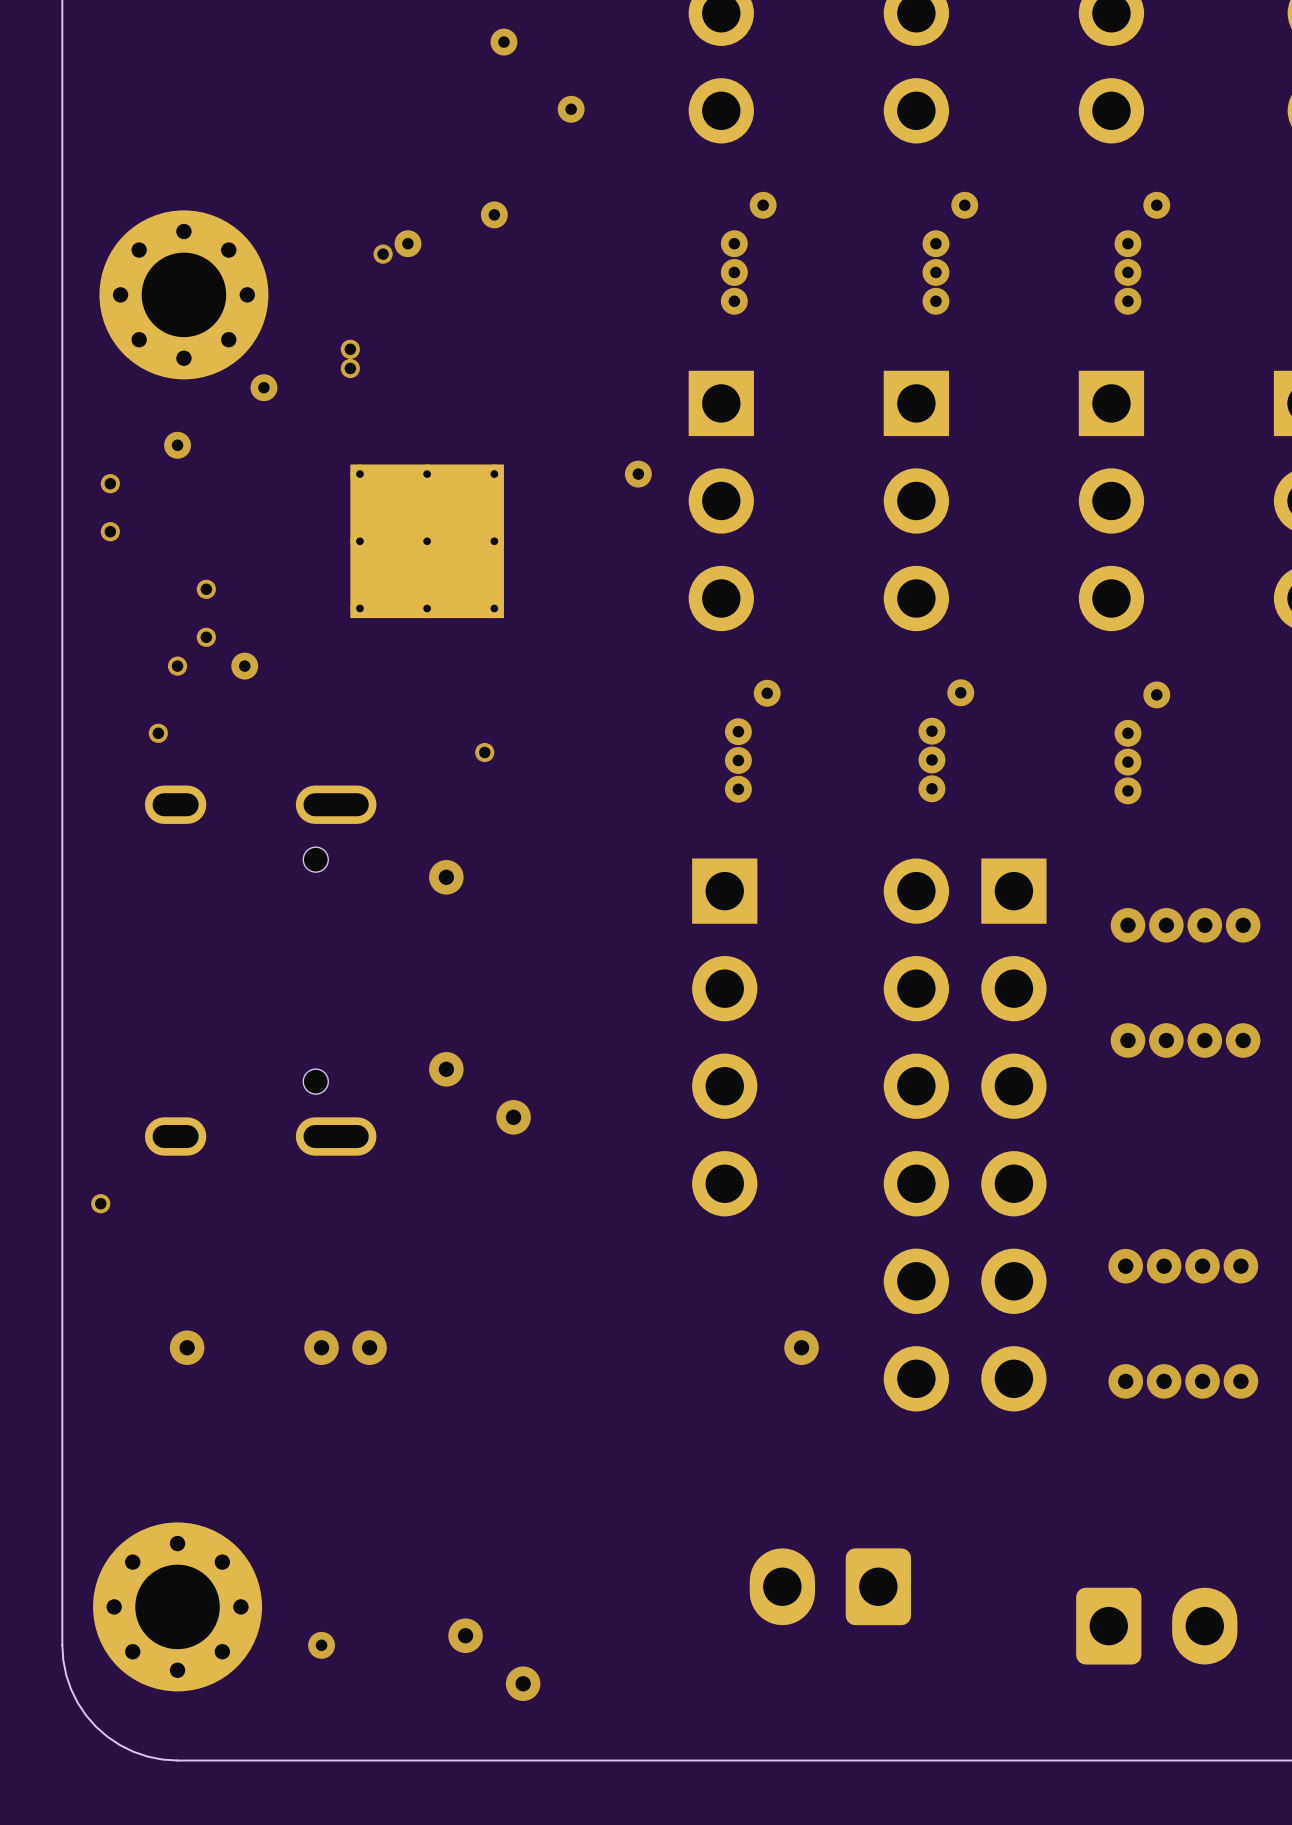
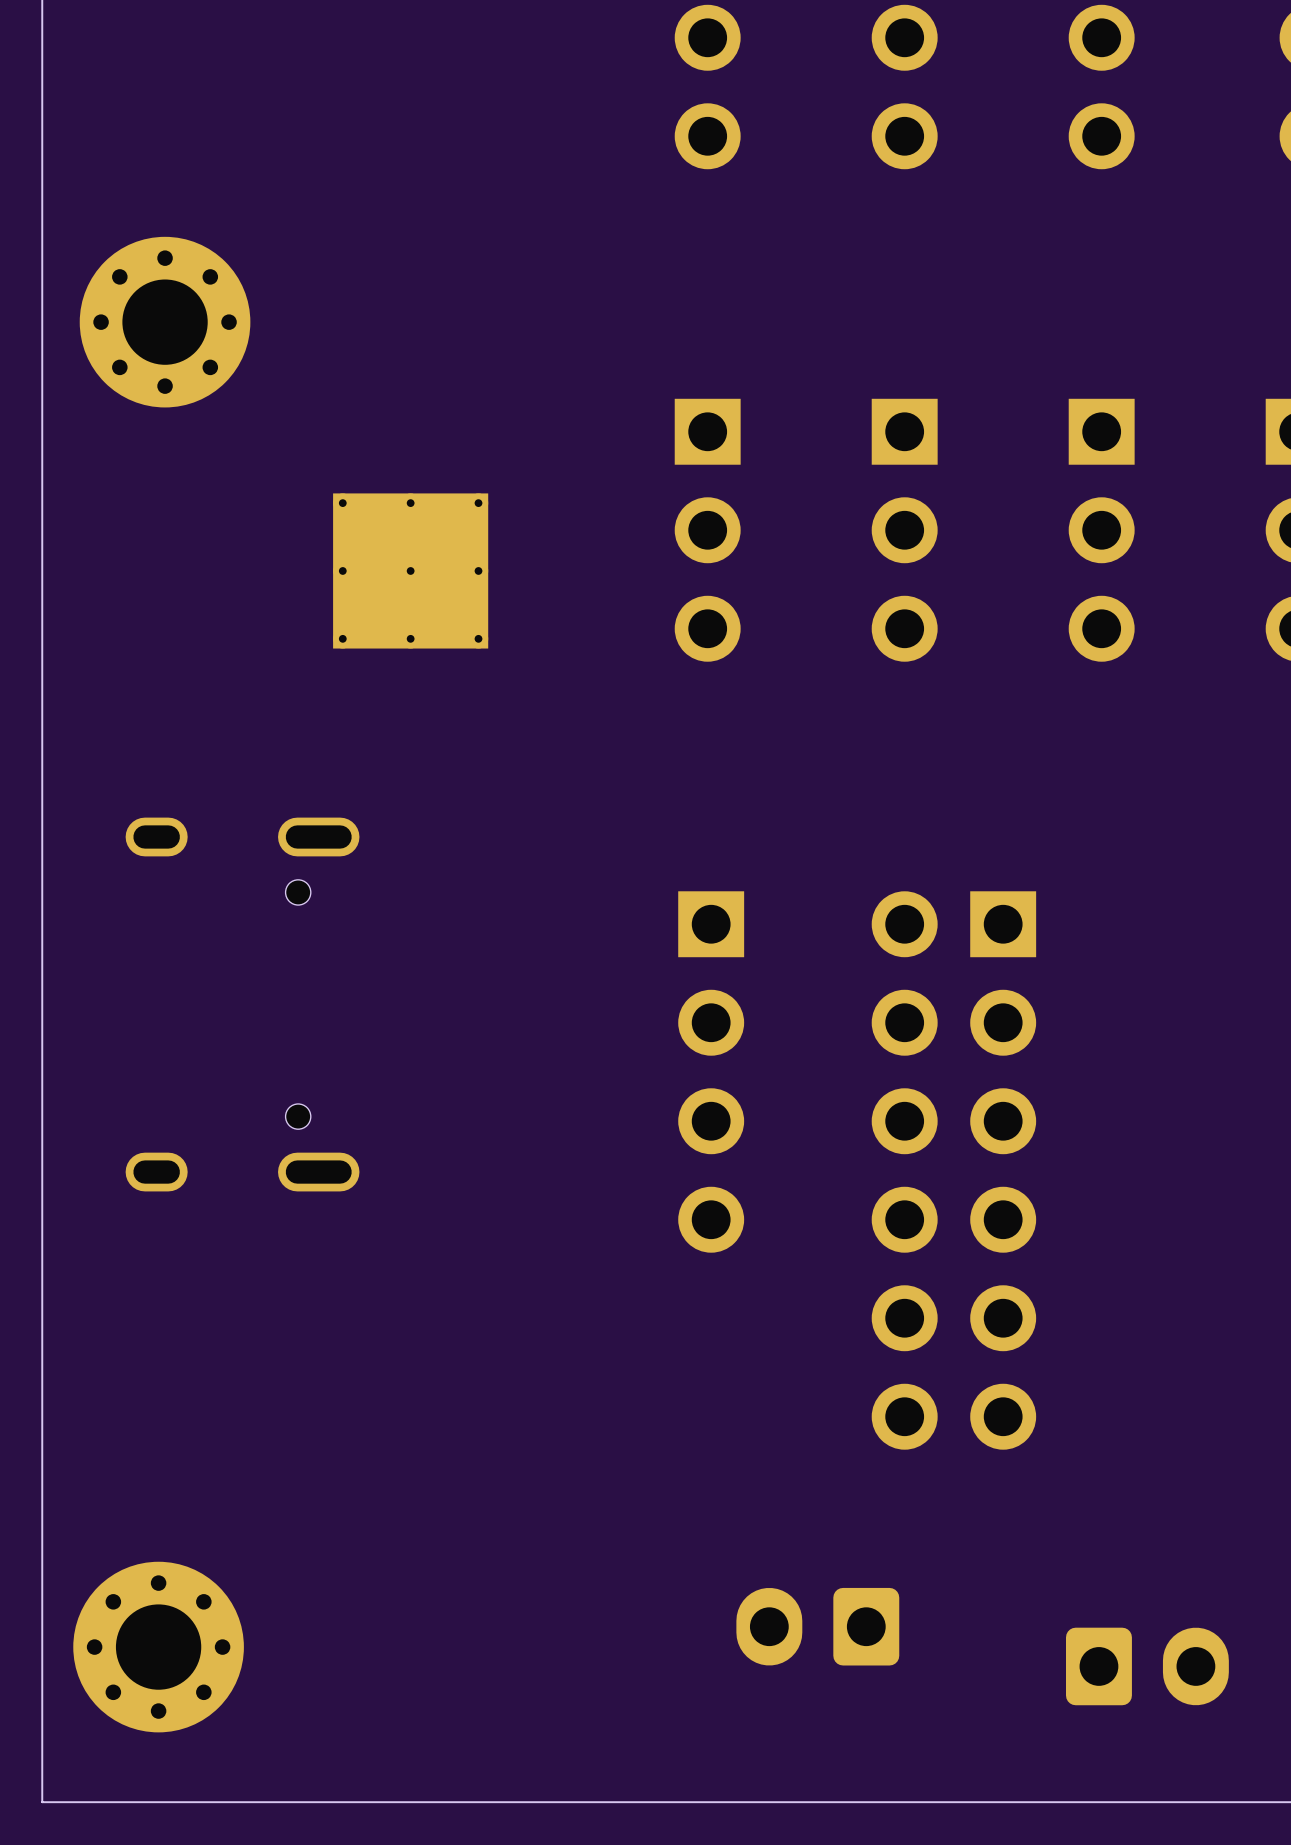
via: (503, 42) -> none
via: (571, 109) -> none
via: (763, 205) -> none
via: (964, 205) -> none
via: (1156, 205) -> none
via: (494, 214) -> none
via: (407, 243) -> none
via: (734, 243) -> none
via: (935, 243) -> none
via: (1127, 243) -> none
via: (383, 254) -> none
via: (734, 272) -> none
via: (935, 272) -> none
via: (1127, 272) -> none
via: (734, 301) -> none
via: (935, 301) -> none
via: (1127, 301) -> none
via: (350, 349) -> none
via: (350, 368) -> none
via: (263, 387) -> none
via: (177, 445) -> none
via: (638, 474) -> none
via: (110, 483) -> none
via: (110, 531) -> none
via: (206, 589) -> none
via: (206, 637) -> none
via: (177, 666) -> none
via: (244, 666) -> none
via: (960, 692) -> none
via: (767, 693) -> none
via: (1156, 694) -> none
via: (738, 731) -> none
via: (931, 731) -> none
via: (158, 733) -> none
via: (1127, 733) -> none
via: (484, 752) -> none
via: (931, 759) -> none
via: (738, 760) -> none
via: (1127, 762) -> none
via: (931, 788) -> none
via: (738, 789) -> none
via: (1127, 790) -> none
via: (446, 877) -> none
via: (1127, 925) -> none
via: (1166, 925) -> none
via: (1204, 925) -> none
via: (1243, 925) -> none
via: (1127, 1040) -> none
via: (1166, 1040) -> none
via: (1204, 1040) -> none
via: (1243, 1040) -> none
via: (446, 1069) -> none
via: (513, 1117) -> none
via: (100, 1203) -> none
via: (1125, 1266) -> none
via: (1164, 1266) -> none
via: (1202, 1266) -> none
via: (1240, 1266) -> none
via: (187, 1347) -> none
via: (321, 1347) -> none
via: (369, 1347) -> none
via: (801, 1347) -> none
via: (1125, 1381) -> none
via: (1164, 1381) -> none
via: (1202, 1381) -> none
via: (1240, 1381) -> none
via: (465, 1635) -> none
board edge: (62, 1645) (63, 1660) (71, 1689) (77, 1702) (96, 1726) (119, 1745) (133, 1751) (147, 1756) (177, 1760) -> (42, 1685) (42, 1802) (158, 1802)
via: (321, 1645) -> none
via: (523, 1683) -> none

